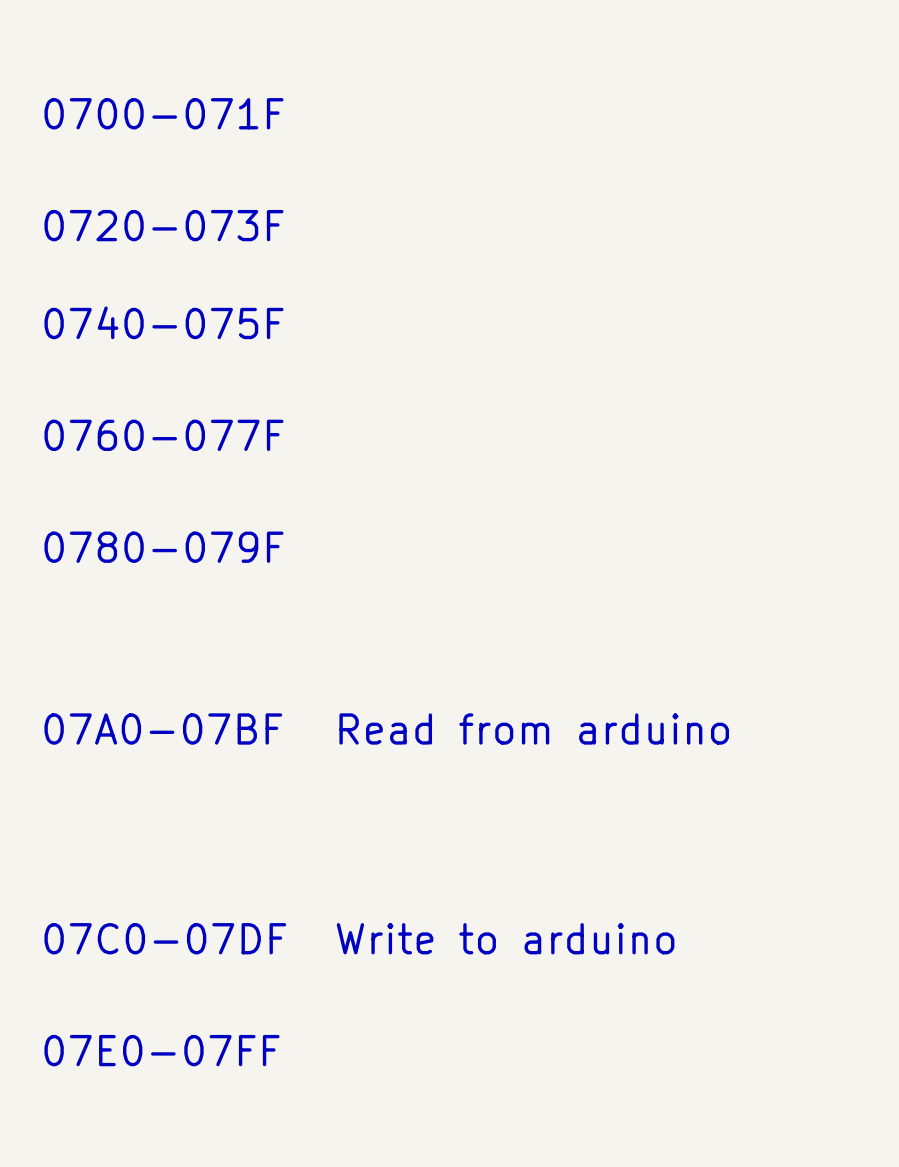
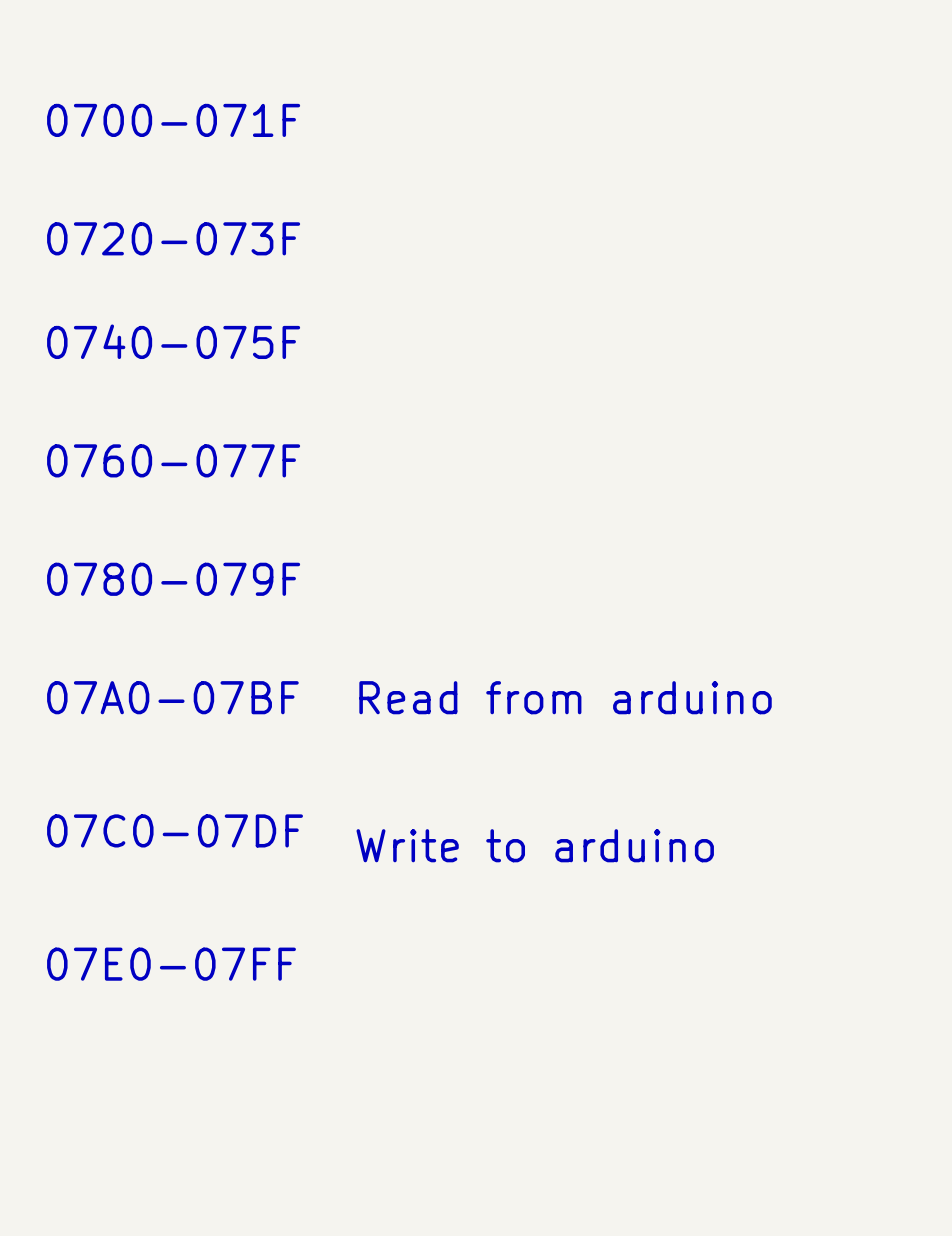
text position: 07A0-07BF (163, 728) -> 07A0-07BF (172, 697)
text position: Read from arduino (534, 728) -> Read from arduino (565, 697)
text position: 07C0-07DF (165, 938) -> 07C0-07DF (175, 830)
text position: Write to arduino (505, 938) -> Write to arduino (535, 845)
text position: 07E0-07FF (162, 1050) -> 07E0-07FF (171, 964)

